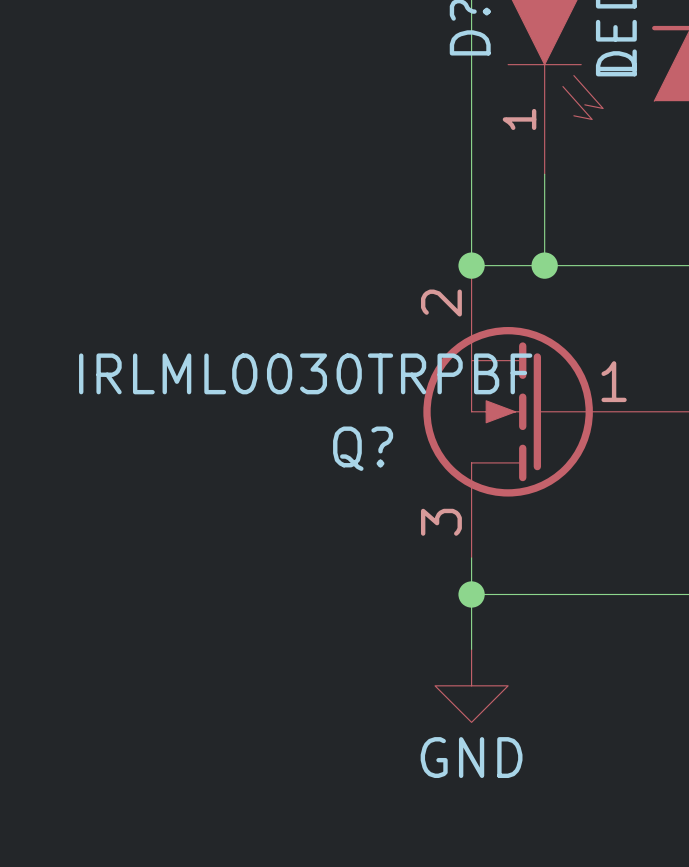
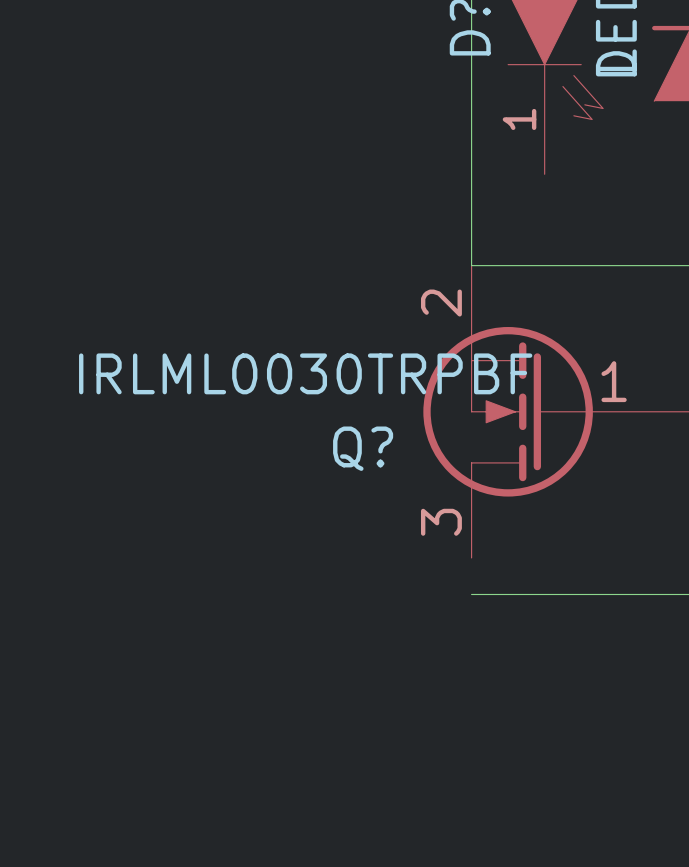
wire: (544, 174) (544, 265) -> none
junction: (471, 265) -> none
junction: (544, 265) -> none
wire: (471, 557) (471, 649) -> none
junction: (471, 594) -> none
power symbol: GND (471, 685) -> none

